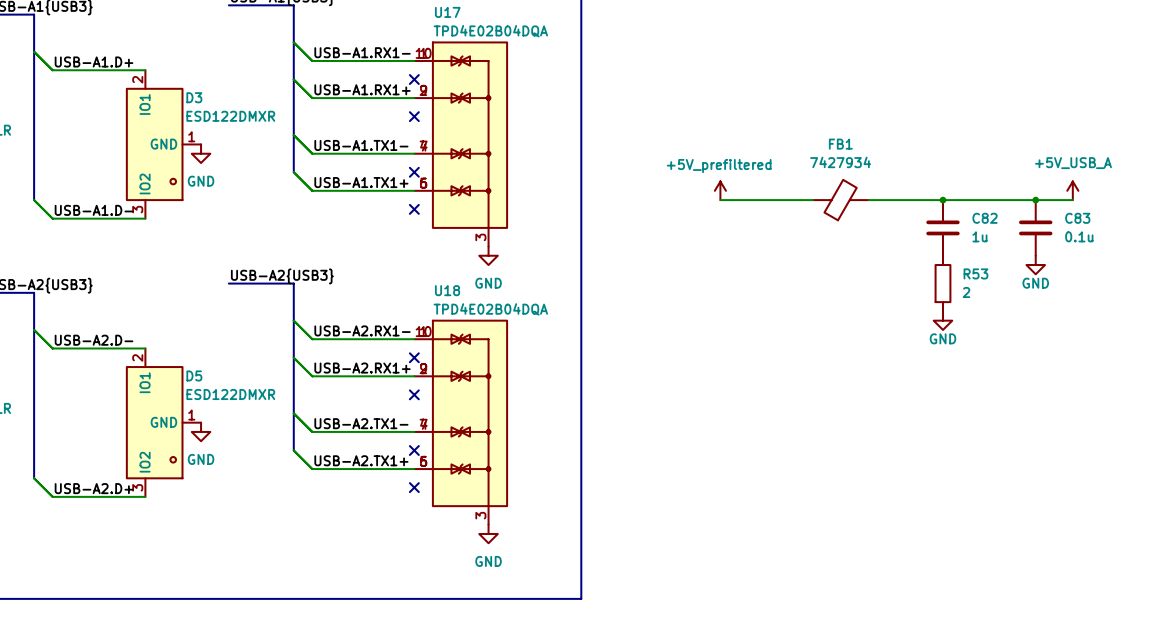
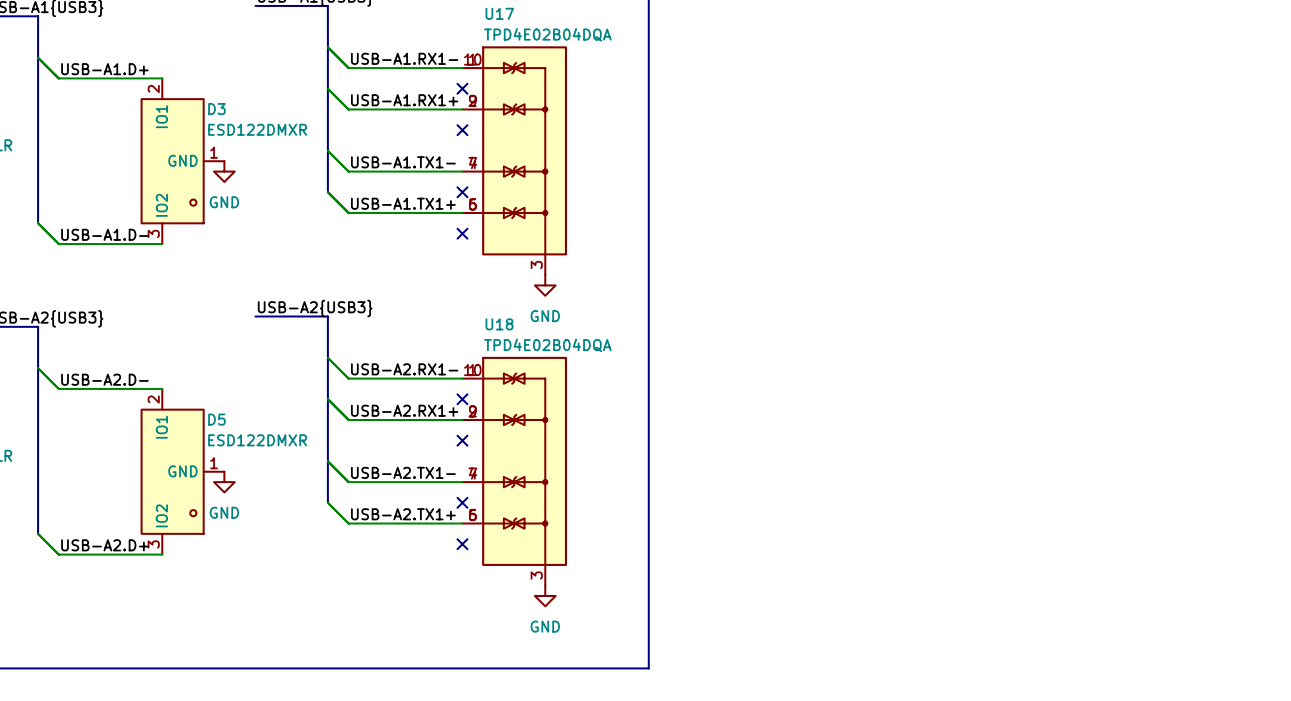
power symbol: +5V_prefiltered (720, 190) -> none
power symbol: +5V_USB_A (1072, 190) -> none
wire: (720, 200) (813, 200) -> none
FB1: 7427934 (840, 200) -> none
wire: (868, 200) (1072, 200) -> none
junction: (942, 200) -> none
junction: (1035, 200) -> none
C82: 1u (942, 227) -> none
C83: 0.1u (1035, 227) -> none
power symbol: GND (1035, 265) -> none
R53: 2 (942, 283) -> none
power symbol: GND (942, 320) -> none

